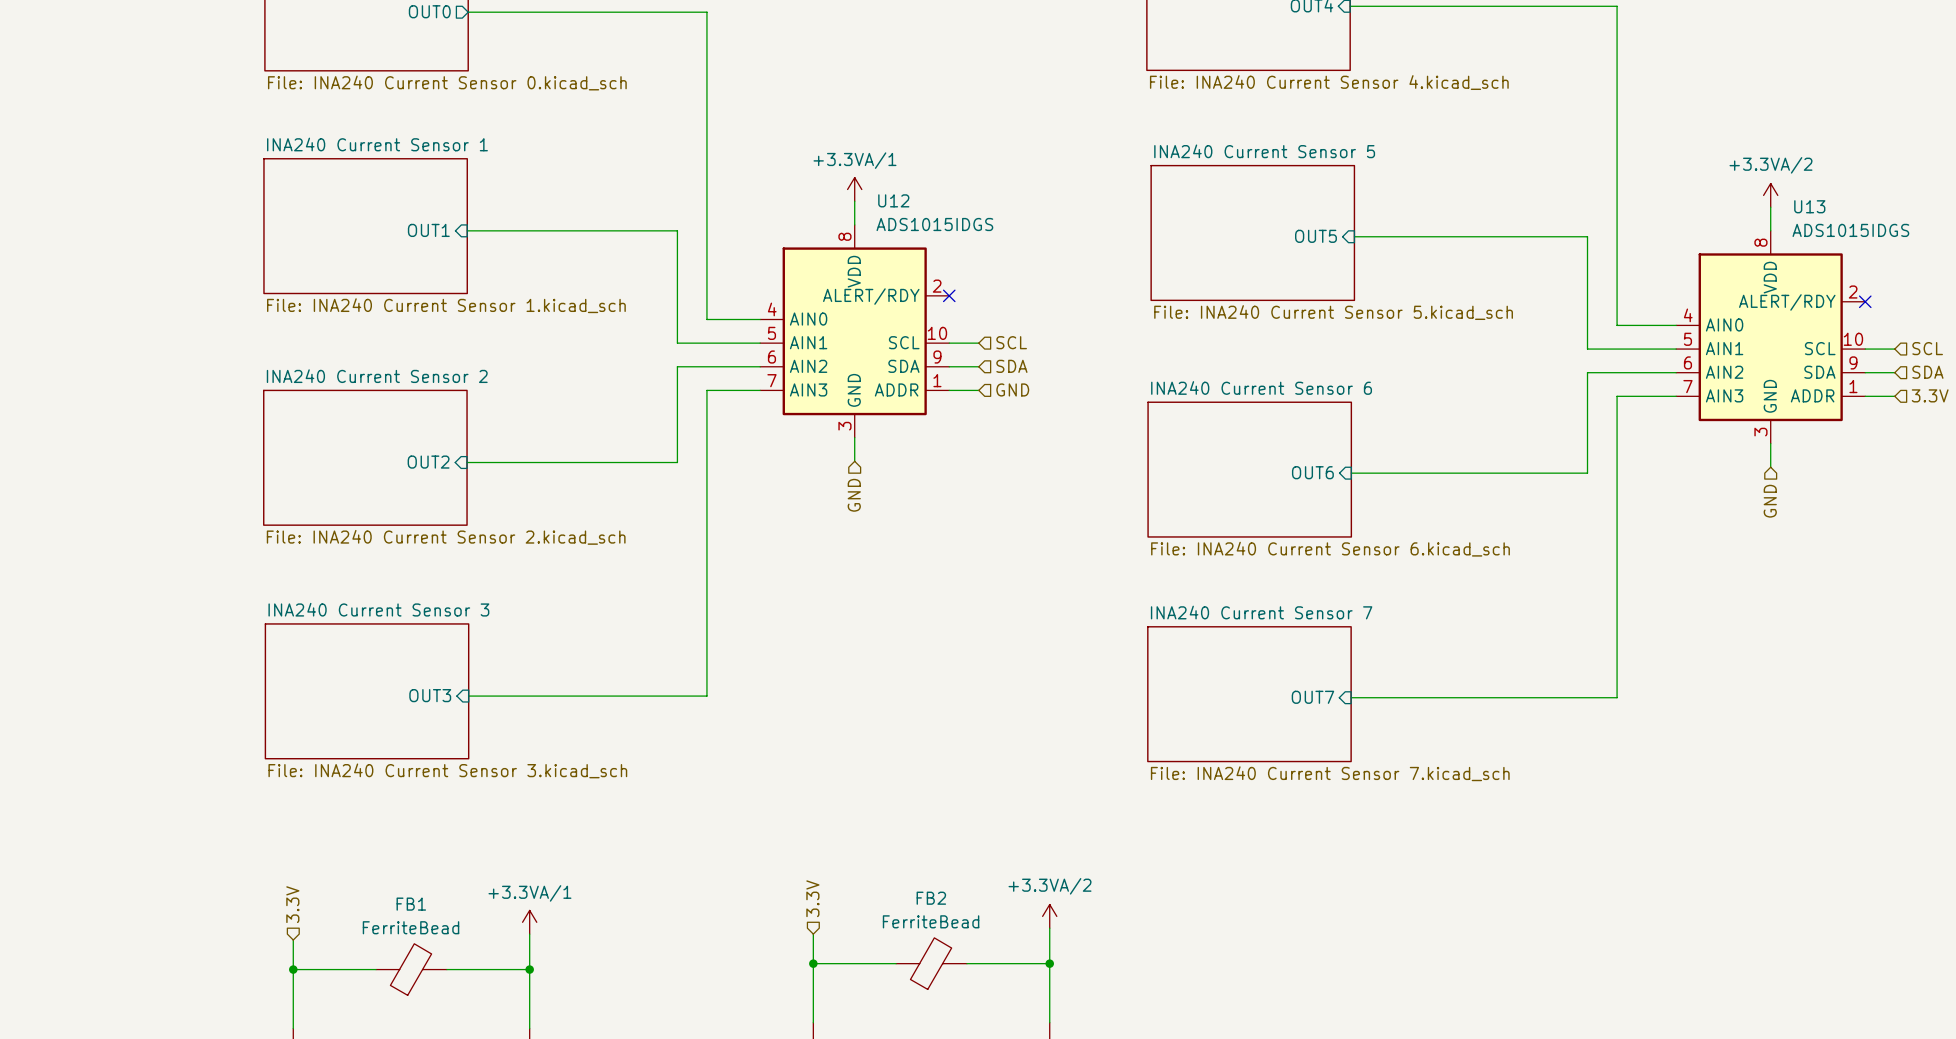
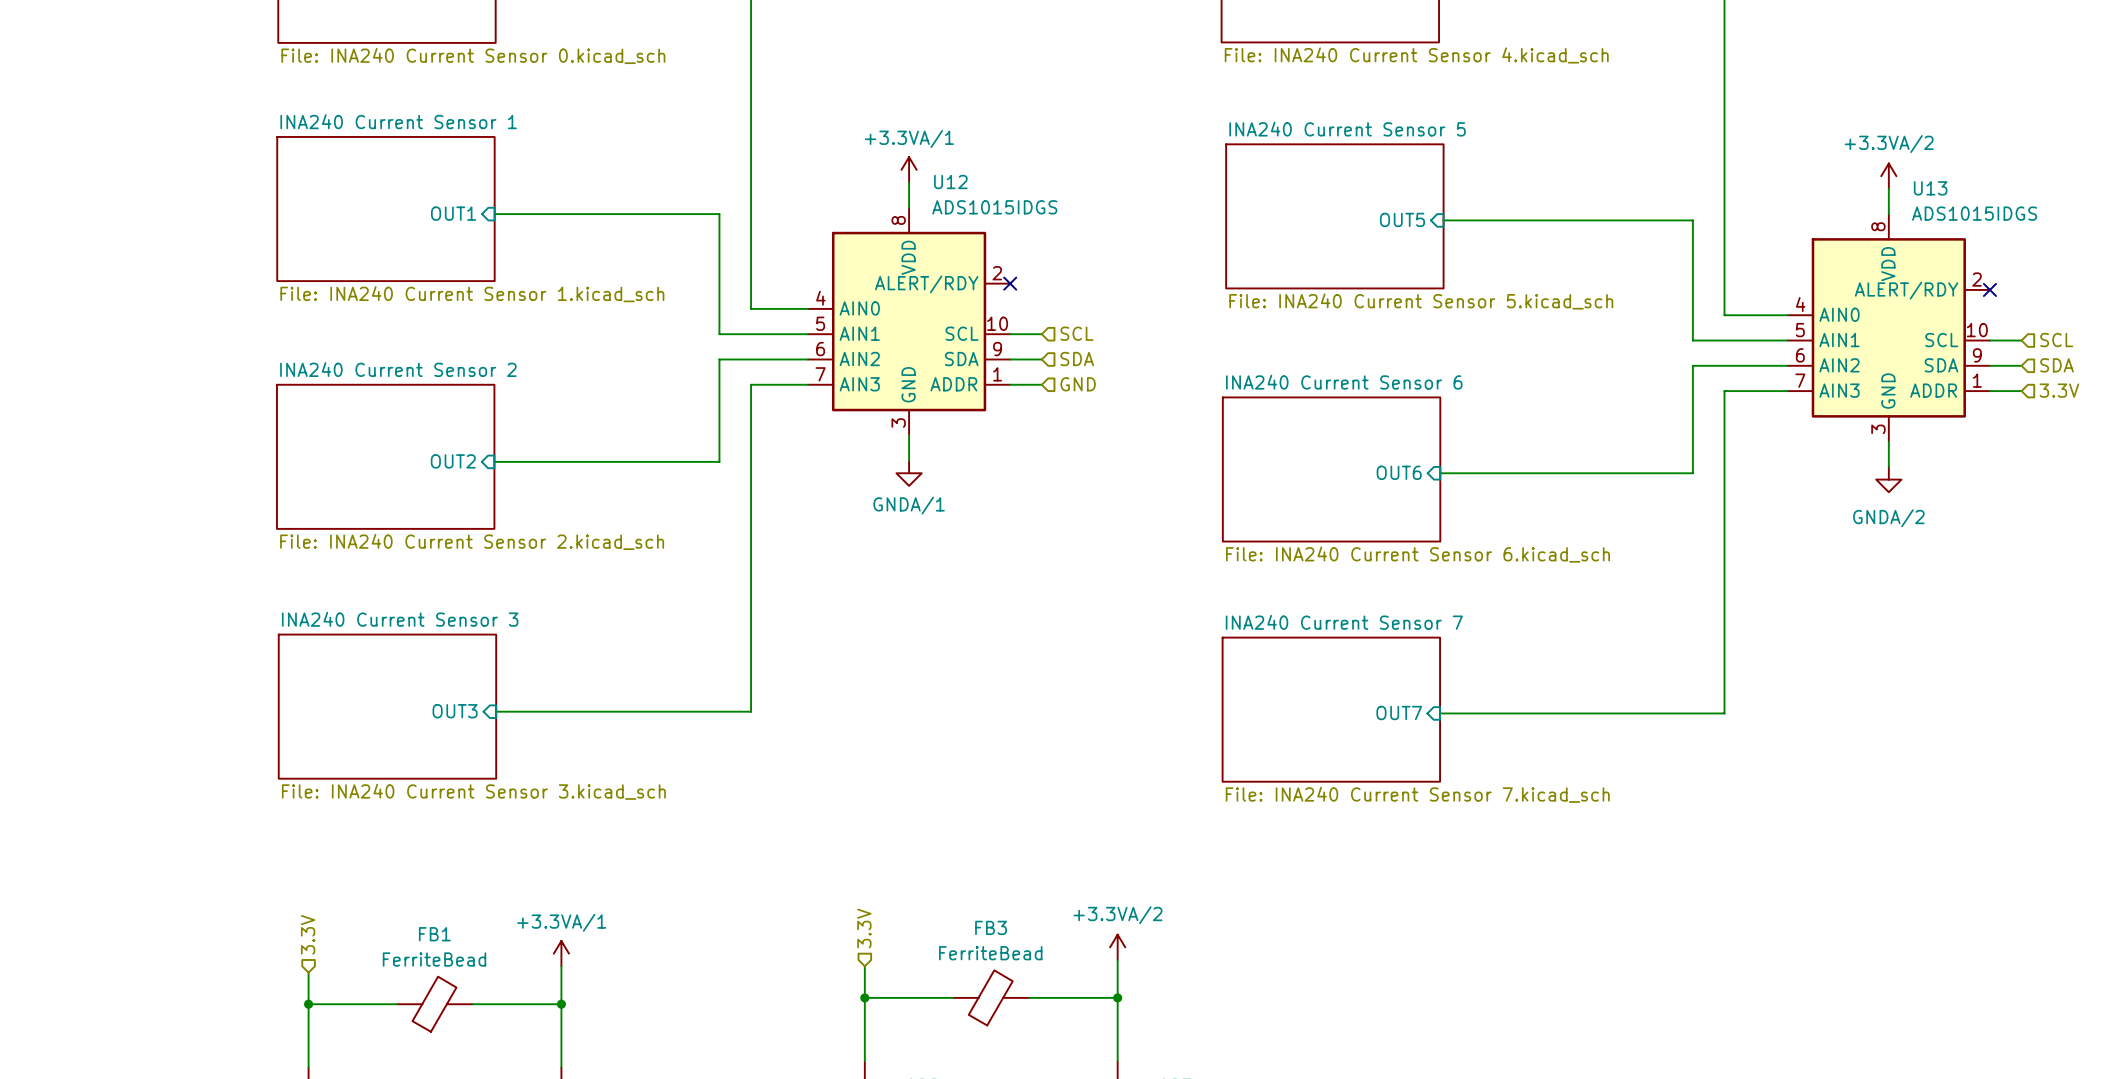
power symbol: none -> GNDA/1 (909, 473)
power symbol: none -> GNDA/2 (1888, 479)
hierarchical label: GND (854, 495) -> none
hierarchical label: GND (1770, 501) -> none
FB2 name: FB2 (931, 898) -> FB3 (991, 927)

